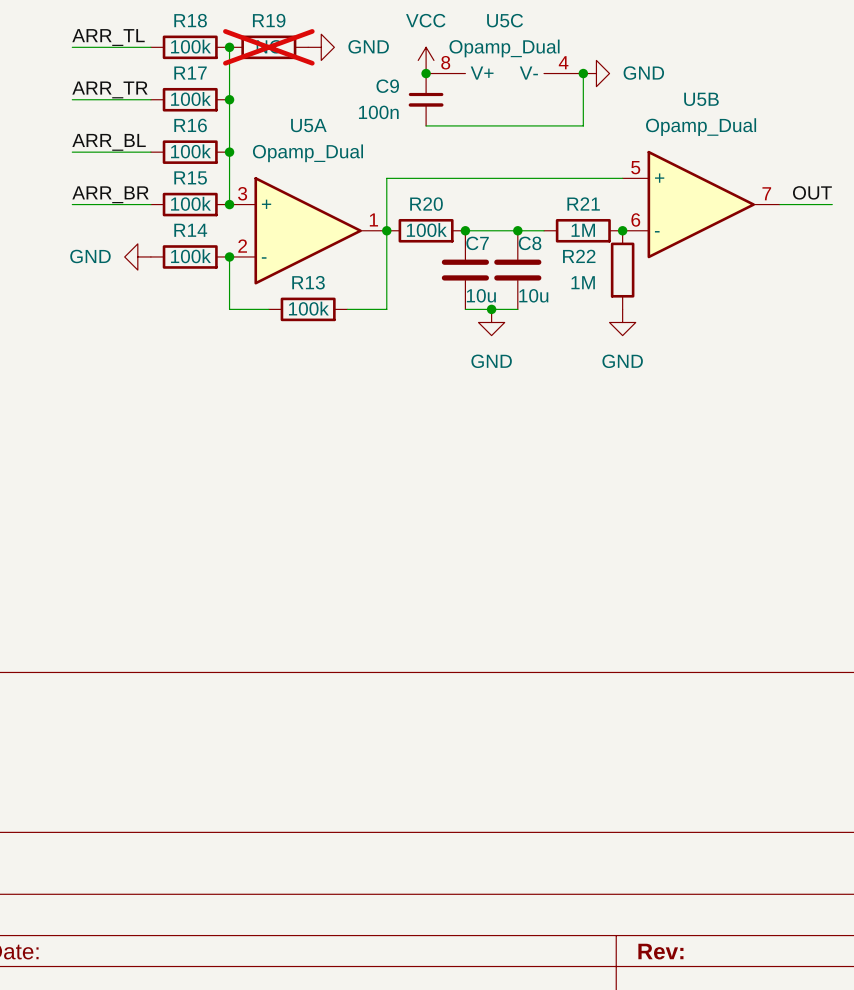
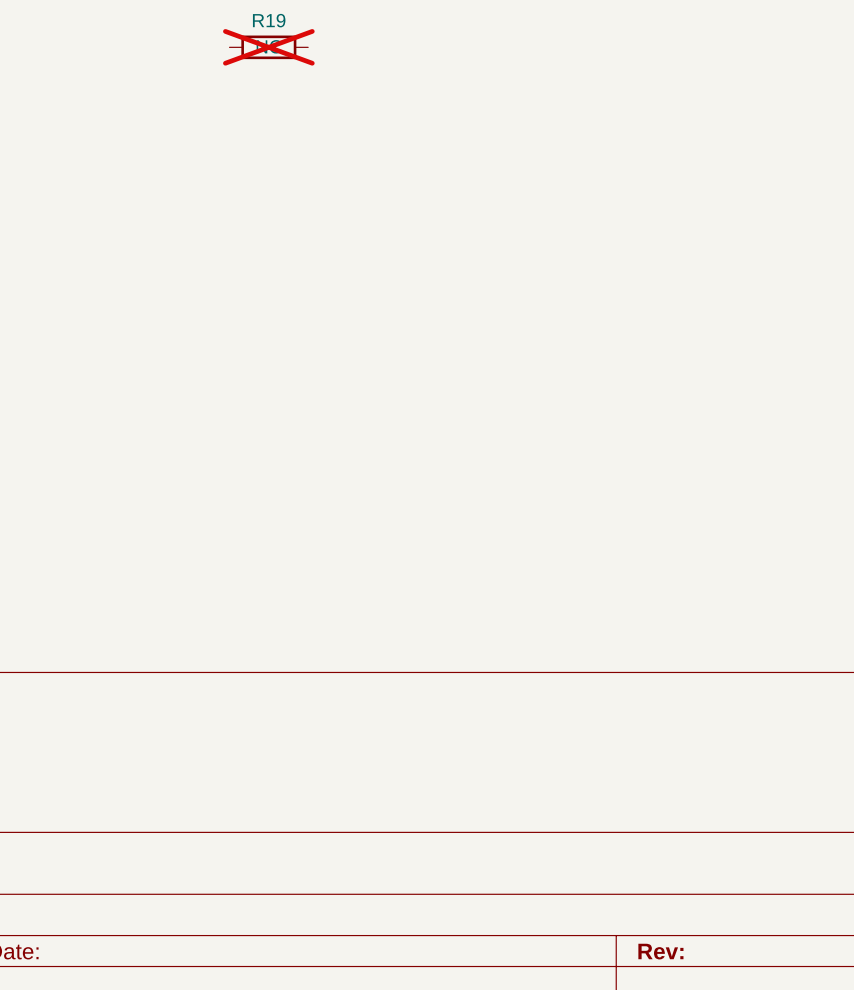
label: ARR_TL (108, 37) -> none
wire: (72, 47) (150, 47) -> none
R18: 100k (190, 47) -> none
wire: (229, 47) (229, 204) -> none
junction: (229, 47) -> none
power symbol: GND (321, 47) -> none
power symbol: VCC (426, 60) -> none
junction: (426, 73) -> none
U5C: Opamp_Dual (504, 73) -> none
wire: (583, 73) (583, 125) (426, 125) -> none
junction: (583, 73) -> none
power symbol: GND (596, 73) -> none
label: ARR_TR (109, 89) -> none
wire: (72, 99) (150, 99) -> none
R17: 100k (190, 99) -> none
junction: (229, 99) -> none
C9: 100n (426, 99) -> none
label: ARR_BL (109, 142) -> none
wire: (72, 152) (150, 152) -> none
R16: 100k (190, 152) -> none
junction: (229, 152) -> none
wire: (622, 178) (386, 178) (386, 309) (347, 309) -> none
label: OUT (812, 192) -> none
label: ARR_BR (110, 194) -> none
wire: (72, 204) (150, 204) -> none
R15: 100k (190, 204) -> none
junction: (229, 204) -> none
U5B: Opamp_Dual (701, 204) -> none
wire: (779, 204) (832, 204) -> none
U5A: Opamp_Dual (308, 230) -> none
junction: (386, 230) -> none
R20: 100k (426, 230) -> none
wire: (465, 230) (544, 230) -> none
junction: (465, 230) -> none
junction: (517, 230) -> none
R21: 1M (583, 230) -> none
junction: (622, 230) -> none
power symbol: GND (137, 256) -> none
R14: 100k (190, 256) -> none
wire: (229, 256) (229, 309) (268, 309) -> none
junction: (229, 256) -> none
C7: 10u (465, 270) -> none
C8: 10u (517, 270) -> none
R22: 1M (622, 270) -> none
R13: 100k (308, 309) -> none
wire: (465, 309) (517, 309) -> none
junction: (491, 309) -> none
power symbol: GND (491, 322) -> none
power symbol: GND (622, 322) -> none

